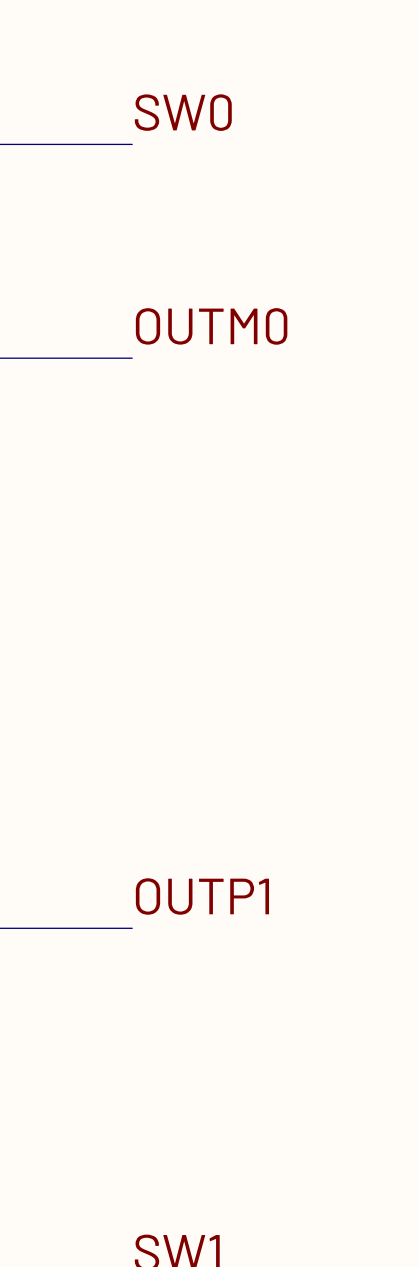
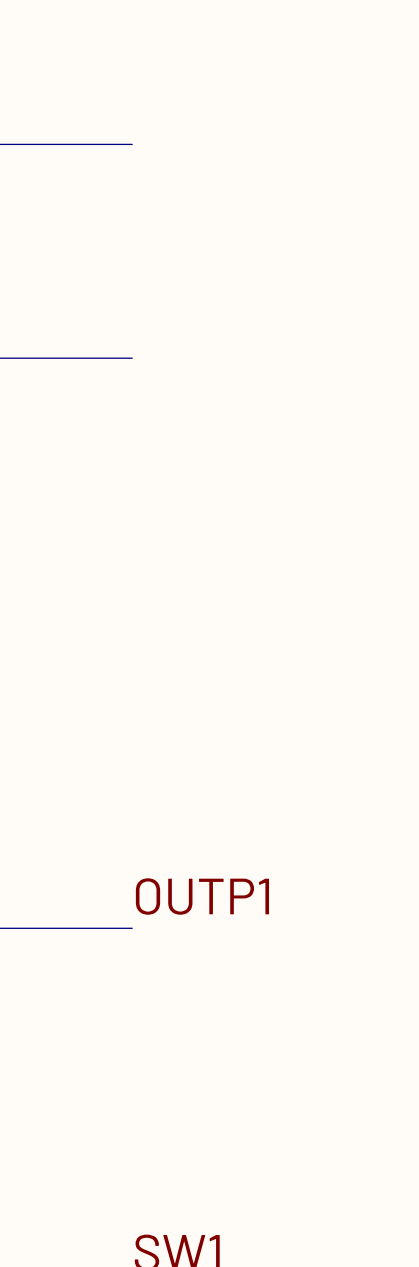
label: SW0 (183, 112) -> none
label: OUTM0 (211, 326) -> none

